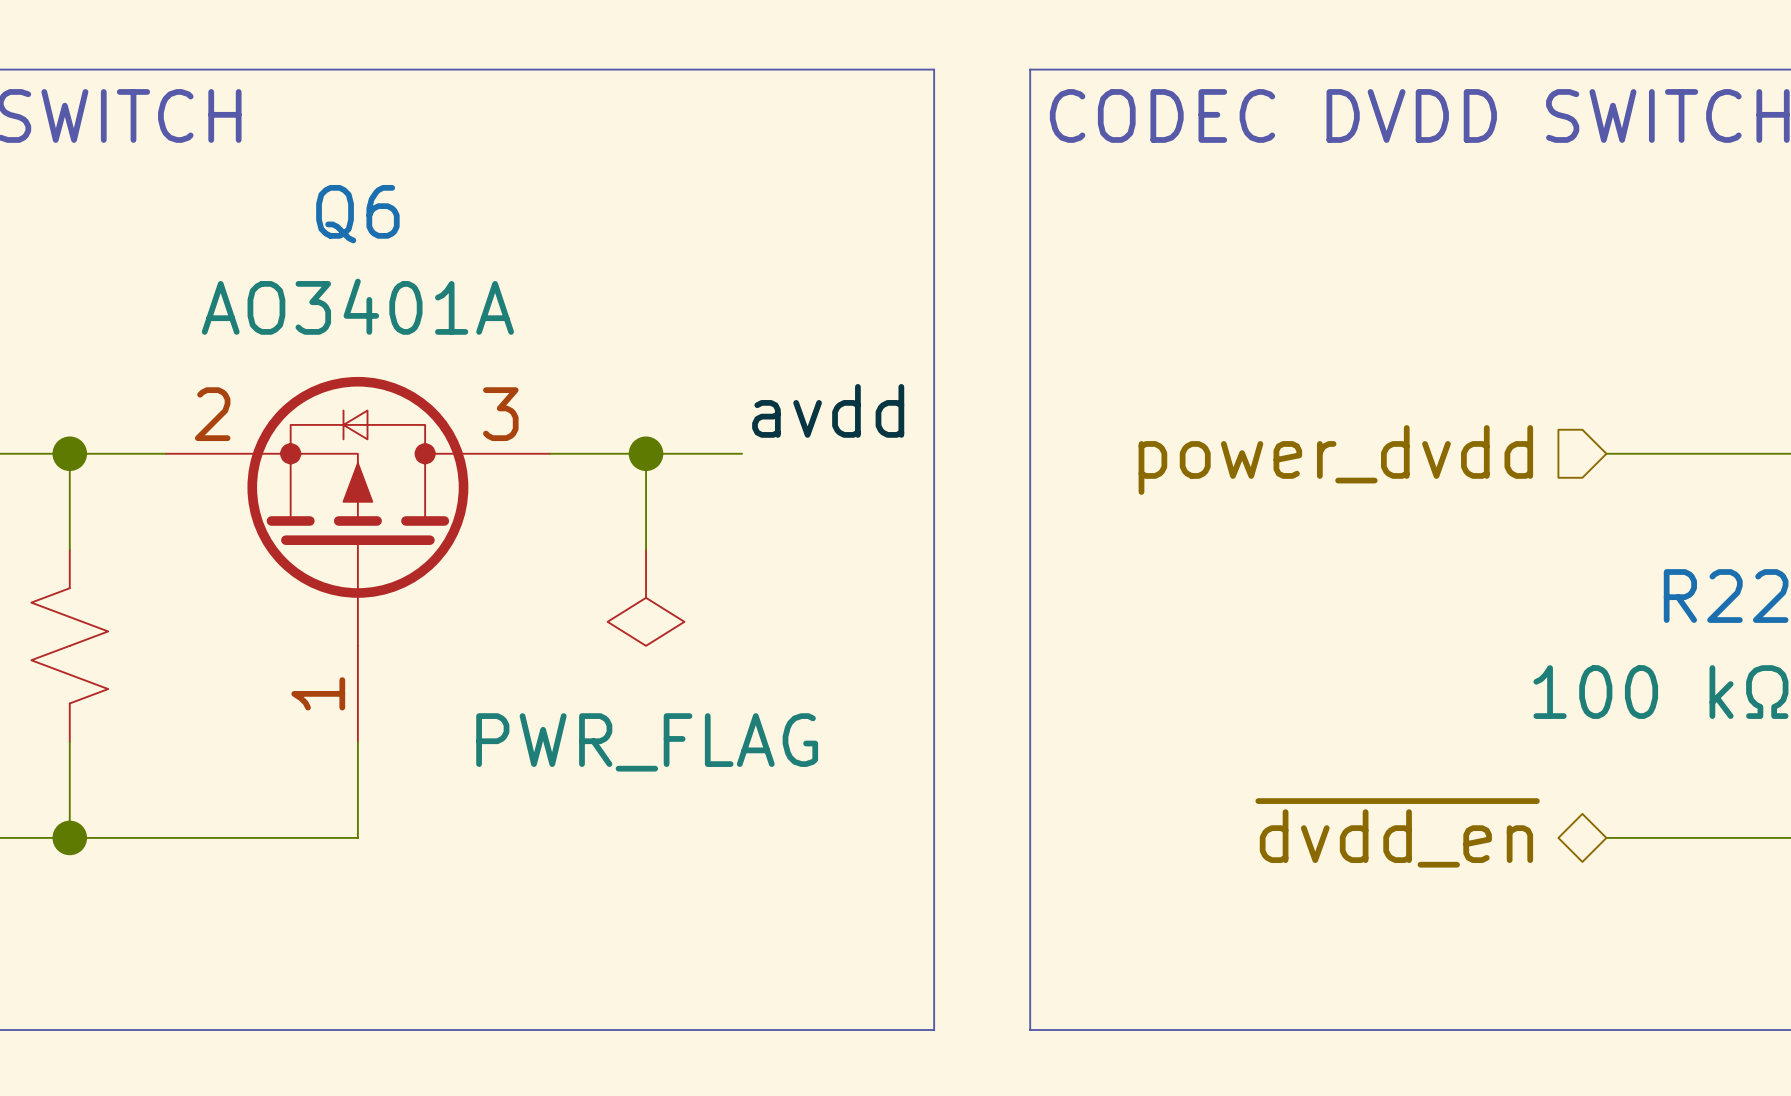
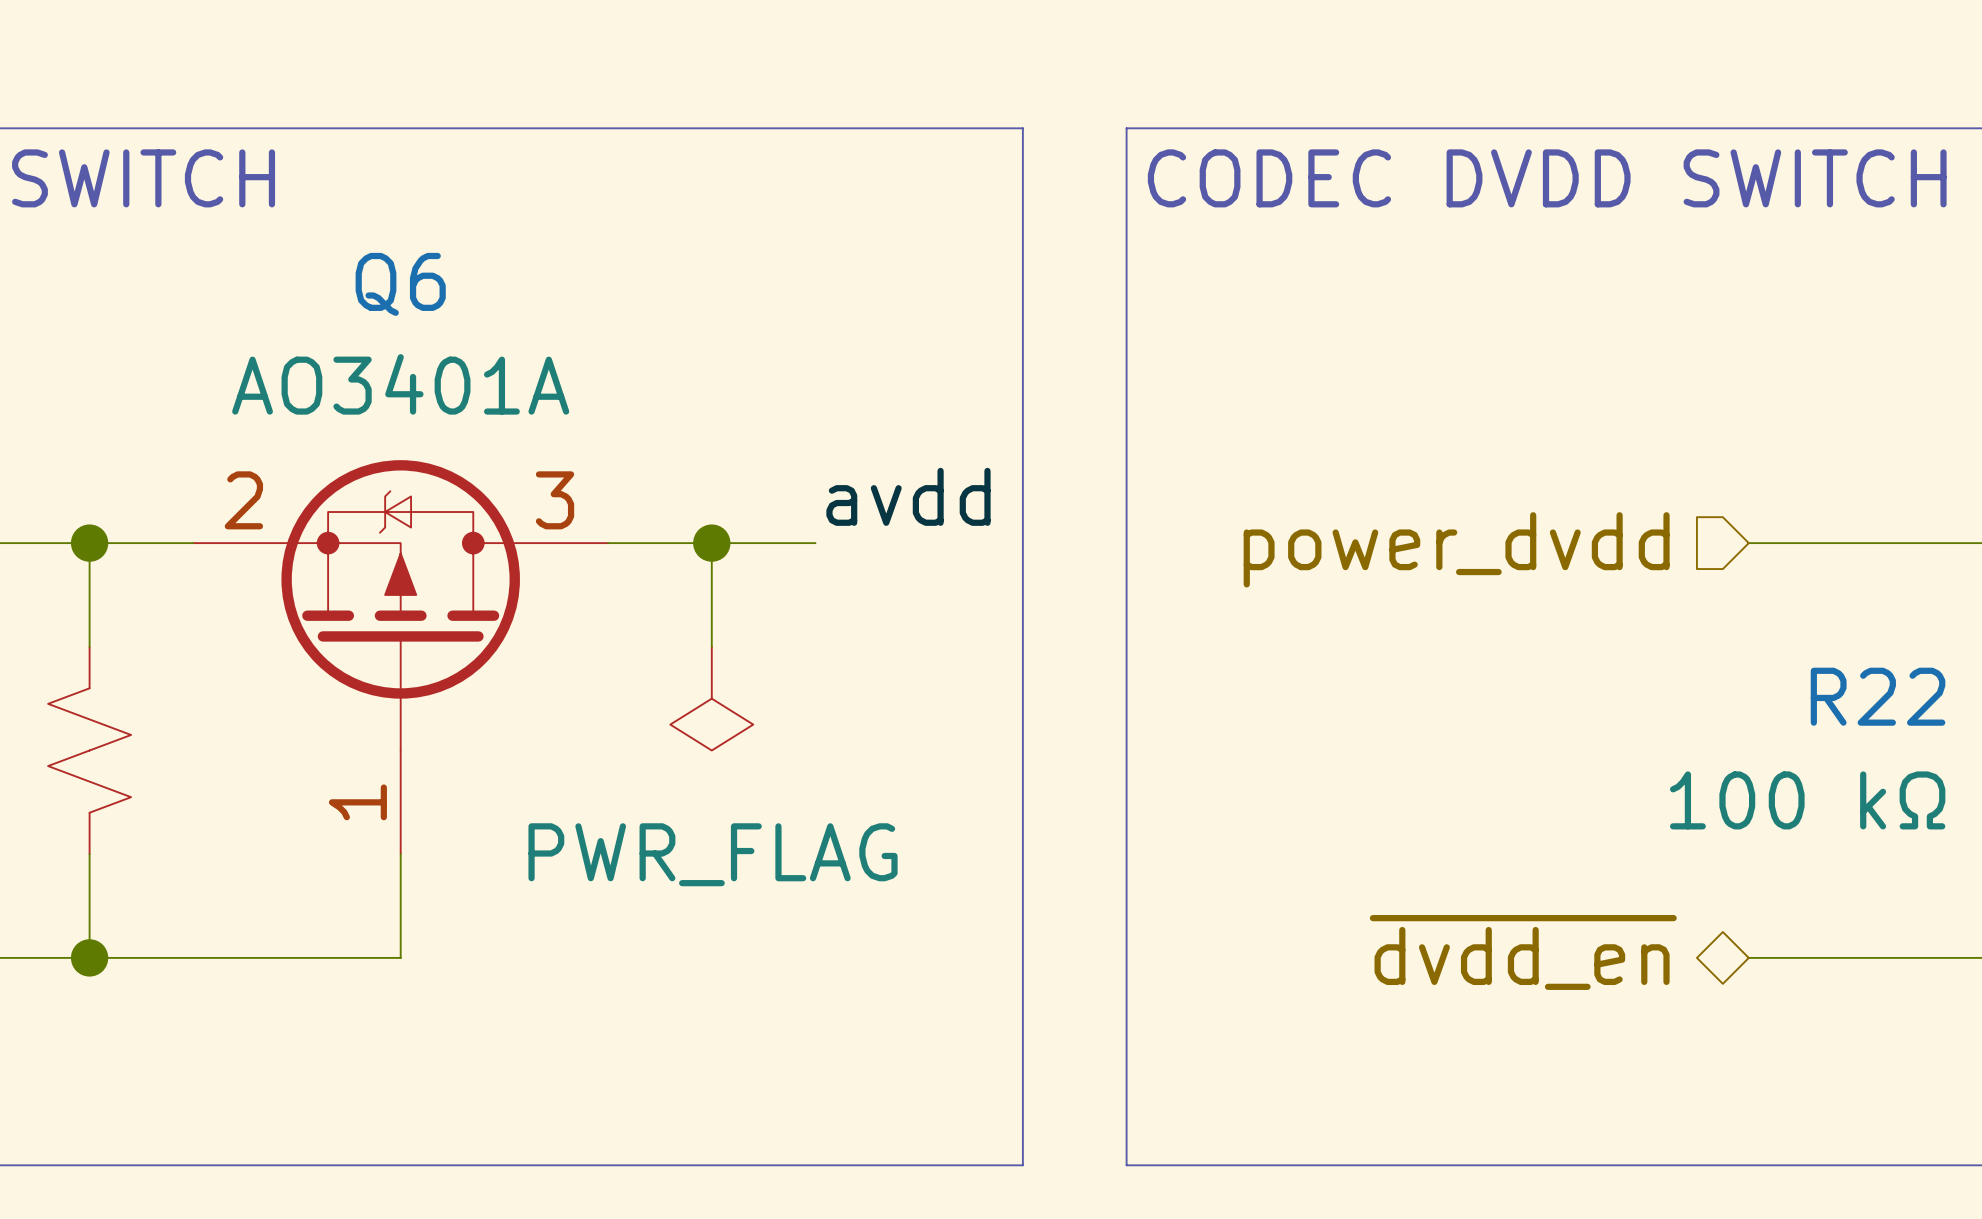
Q6 symbol: [165, 376, 550, 742] -> [193, 460, 609, 855]

